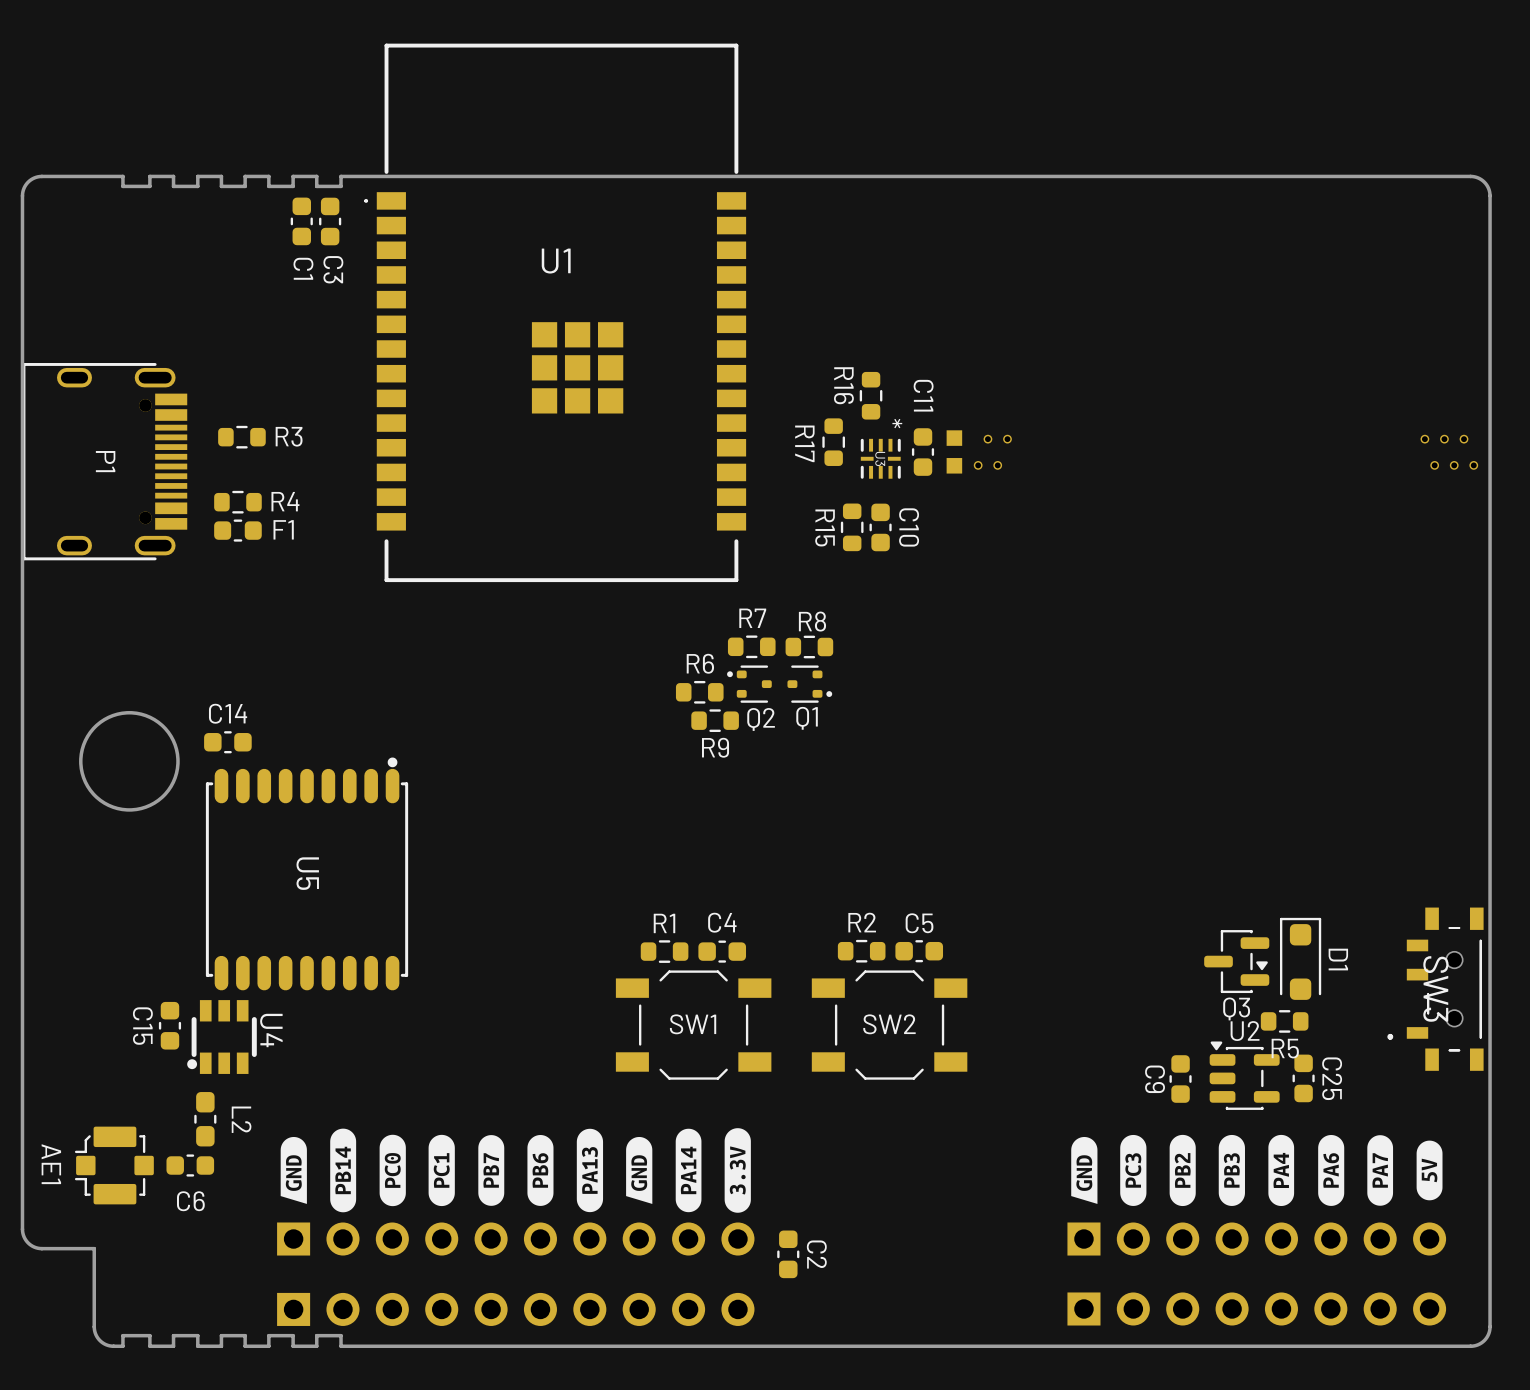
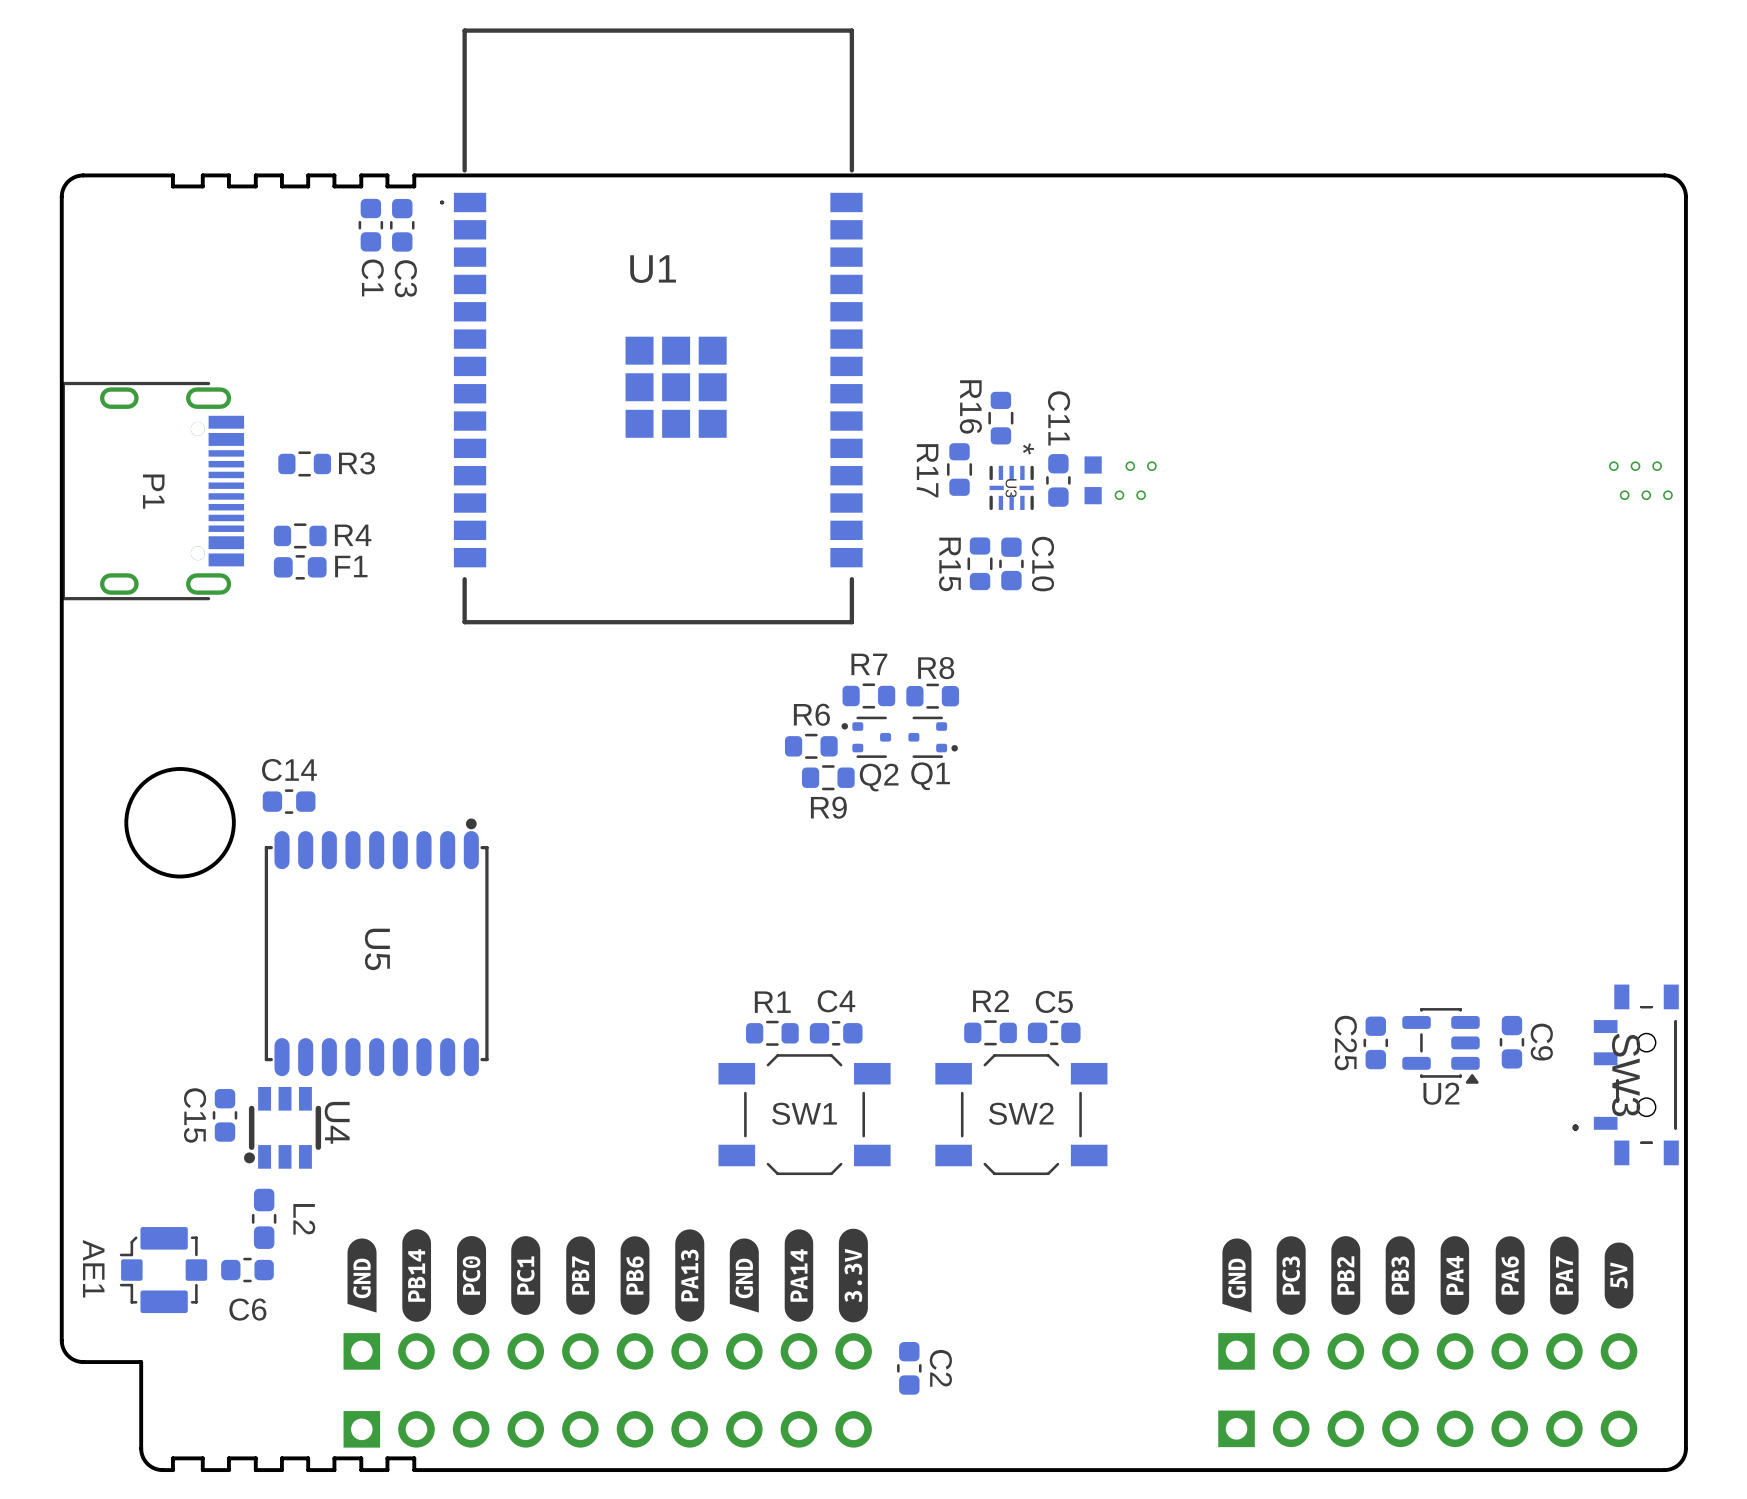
D1: (1300, 958) -> none
Q3: (1236, 961) -> none
R5: (1284, 1021) -> none
U2 rotation: 0° (1244, 1075) -> 180° (1441, 1045)
U2 position: (1244, 1075) -> (1441, 1045)
C25 position: (1303, 1078) -> (1375, 1042)
C25 name position: C25 (1332, 1078) -> C25 (1345, 1043)
C9 name position: C9 (1155, 1079) -> C9 (1541, 1042)
C9 position: (1180, 1079) -> (1511, 1042)

